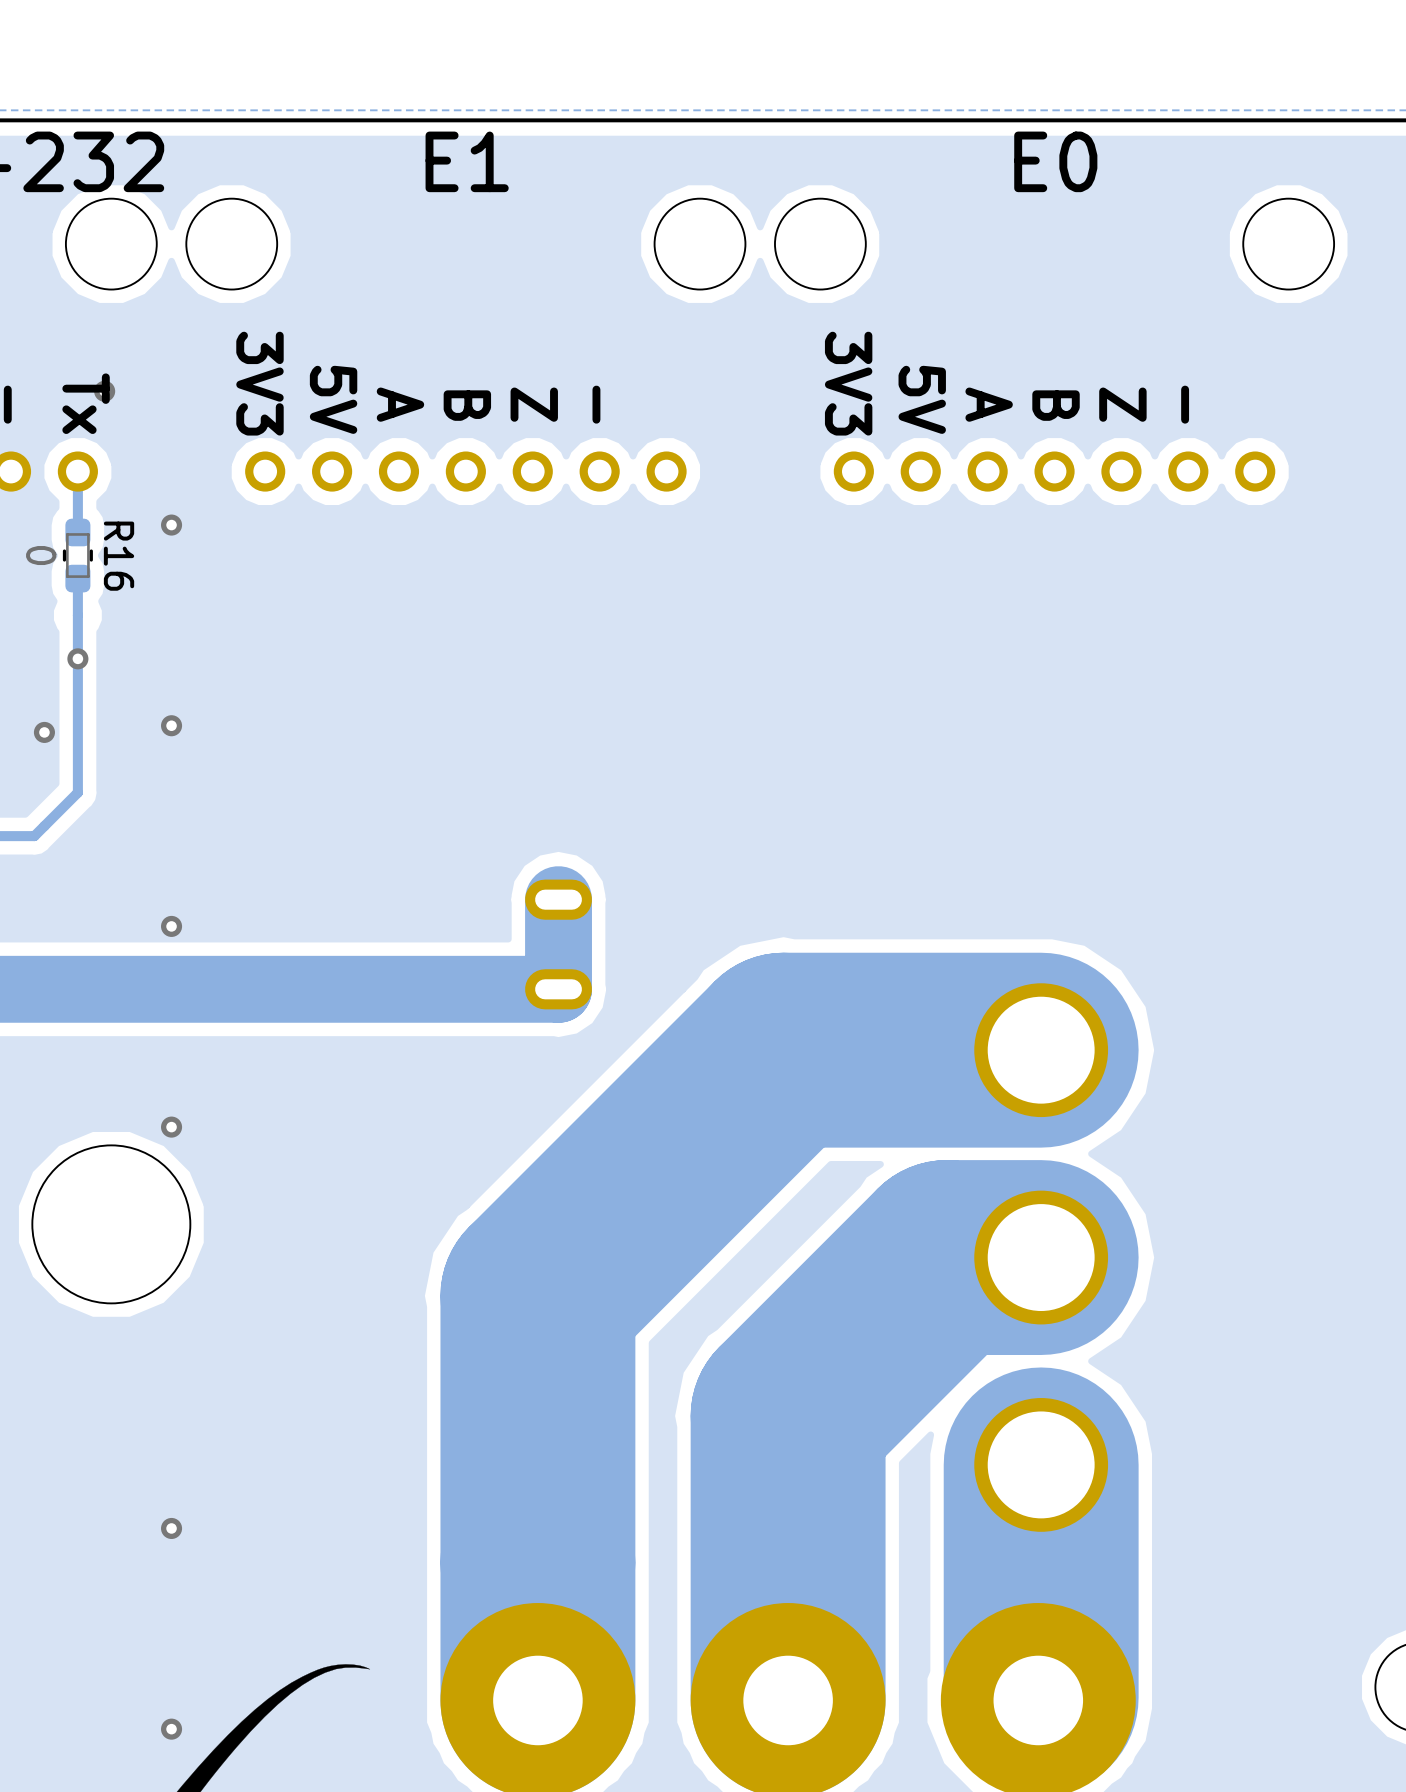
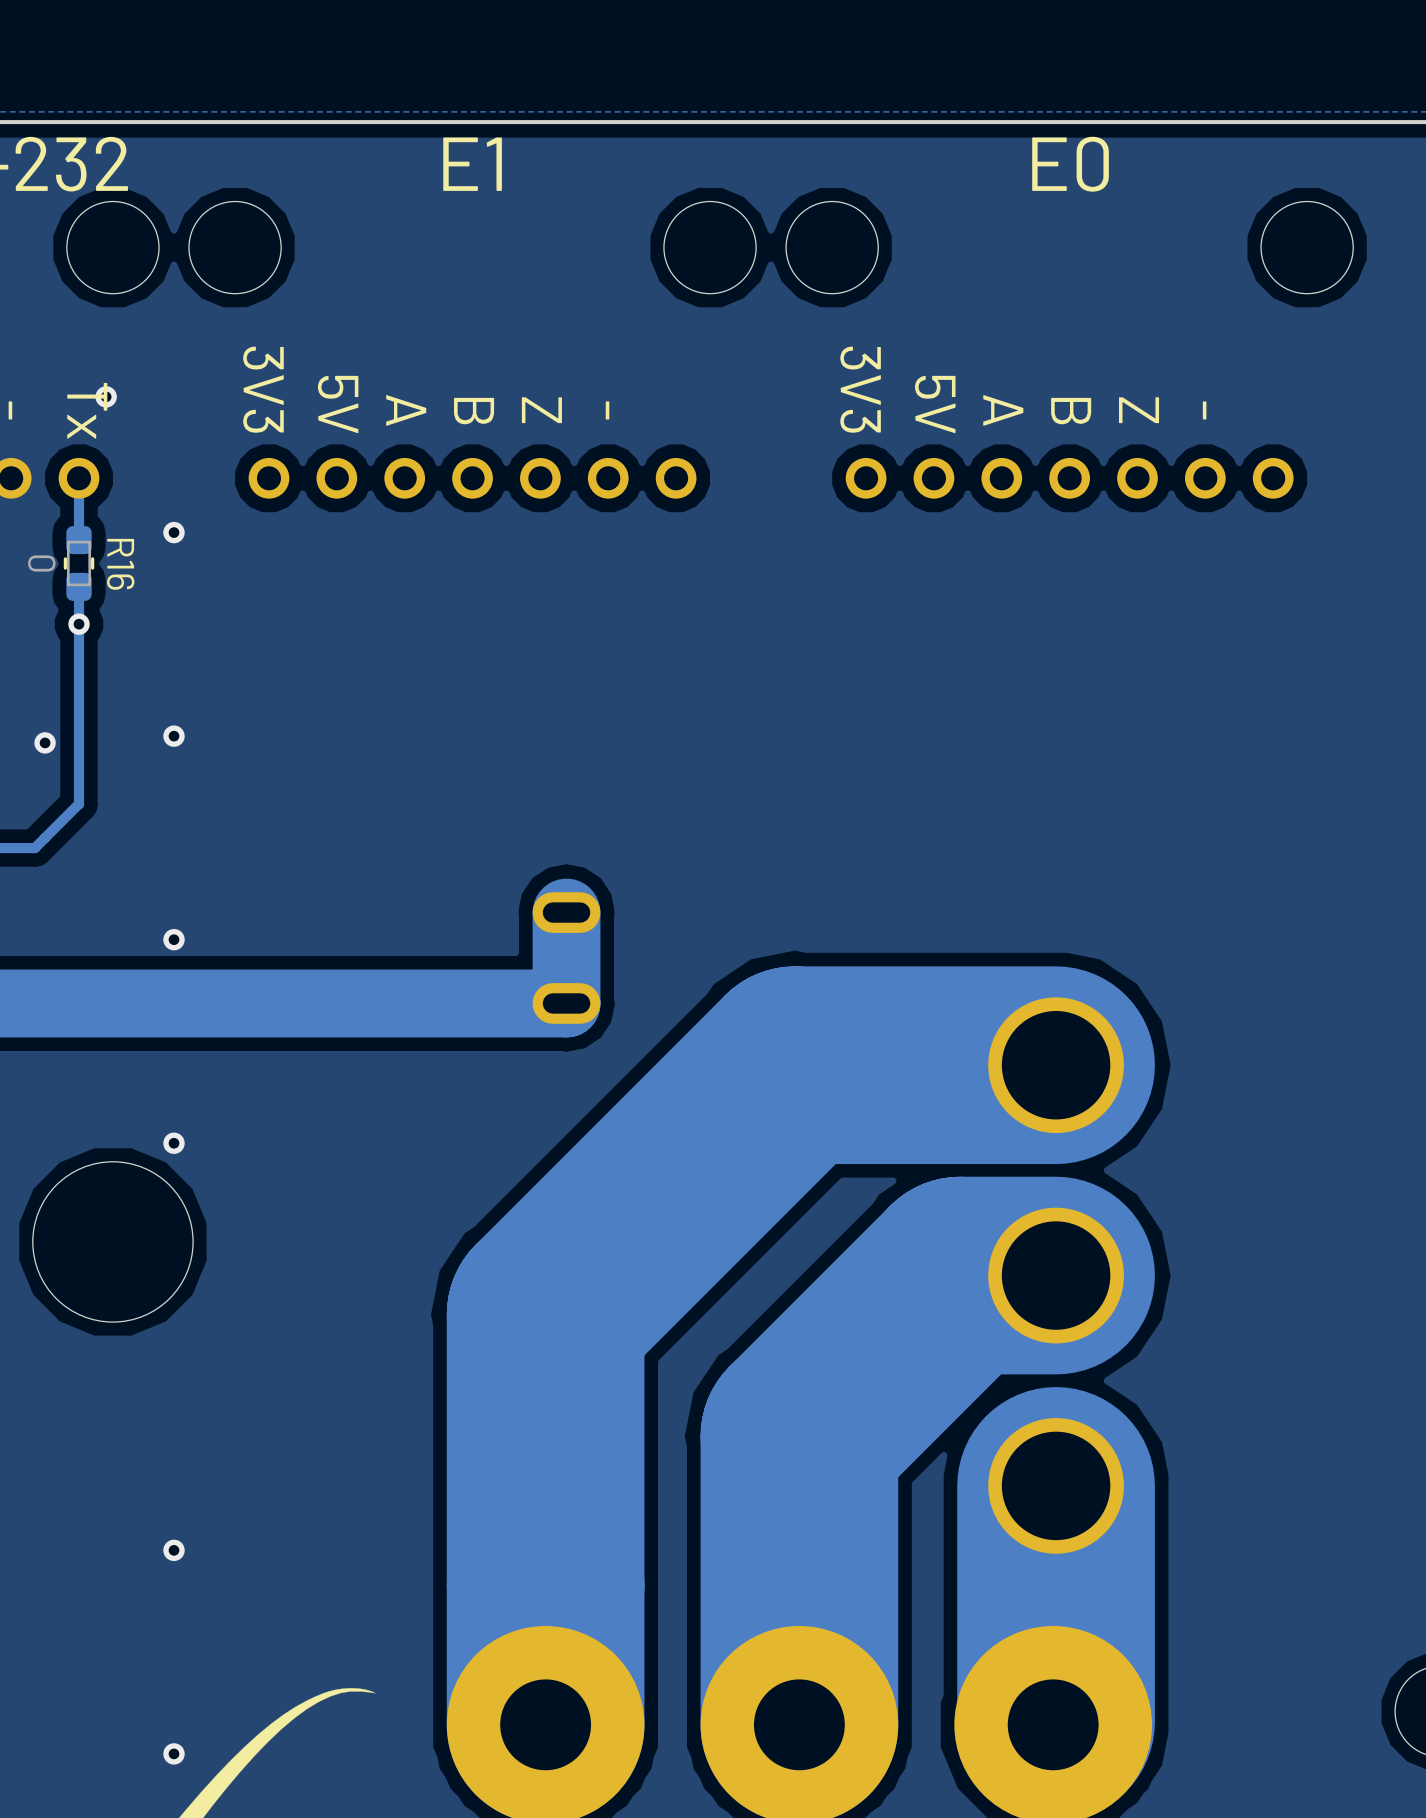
via position: (77, 658) -> (79, 624)

